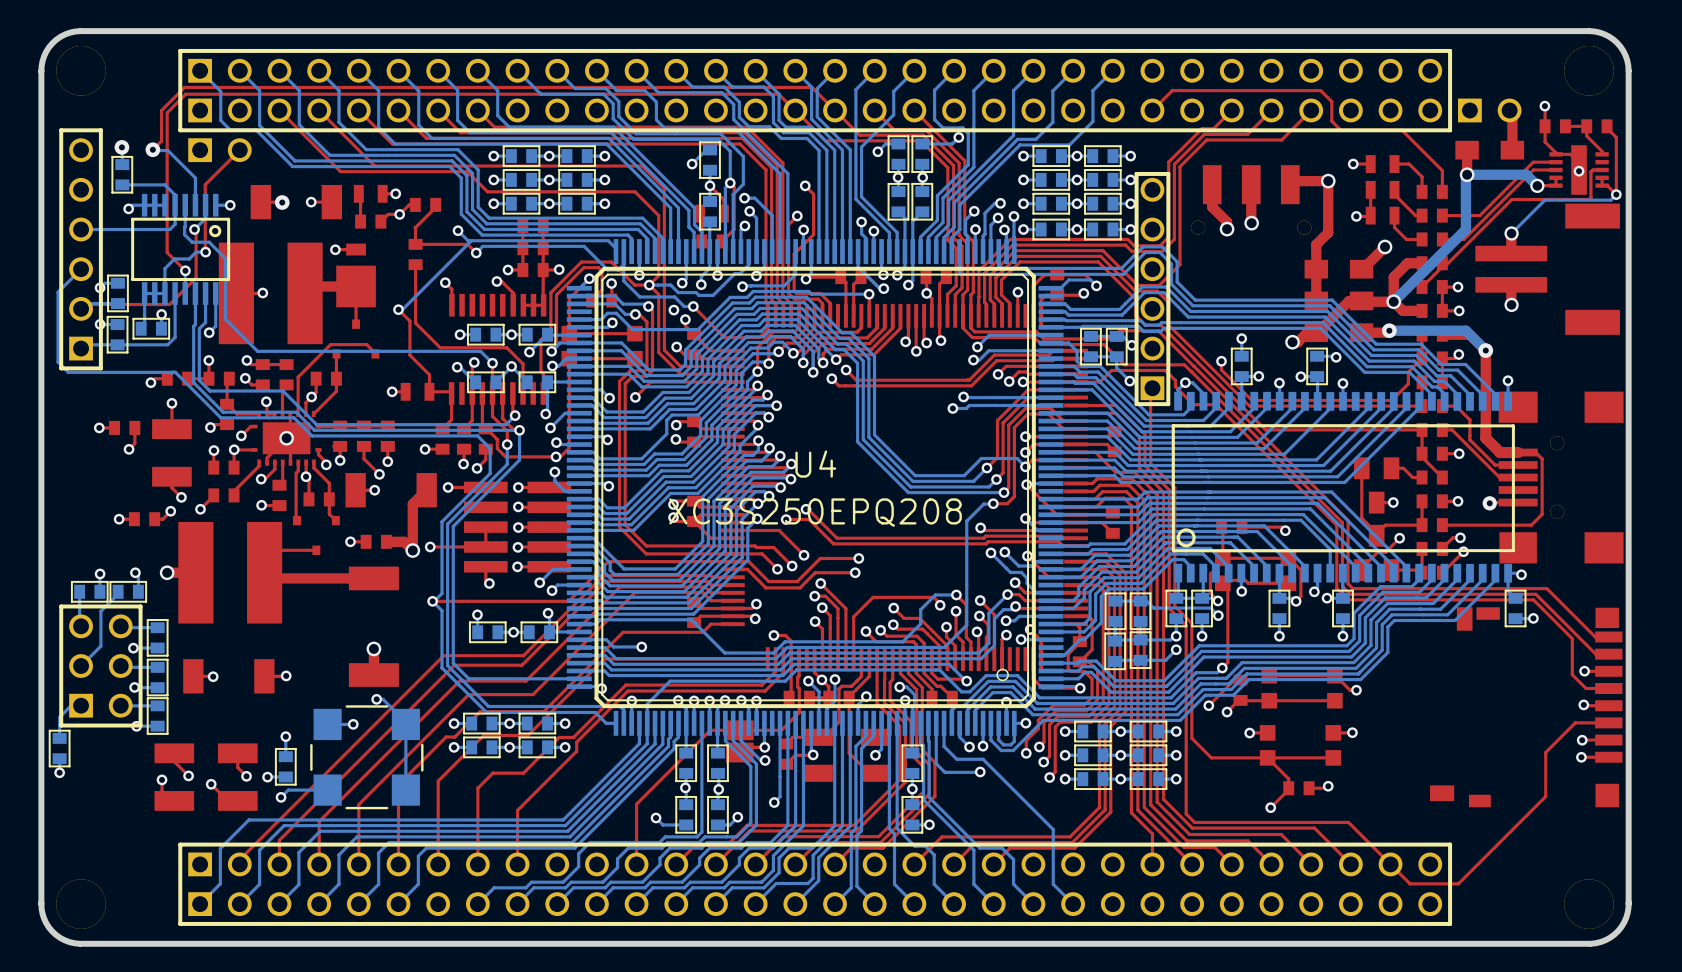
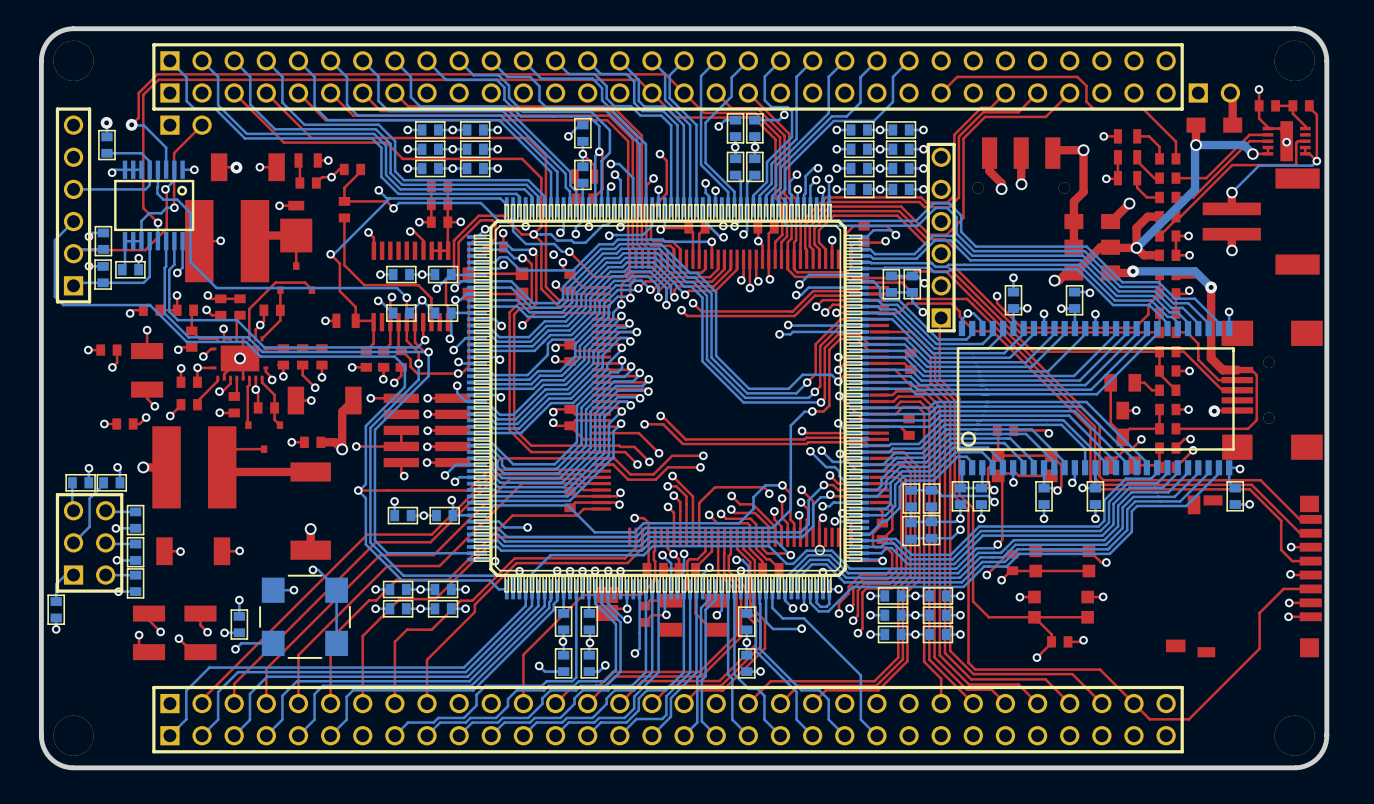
U4: XC3S250EPQ208 (815, 487) -> none
part: none -> (668, 398)

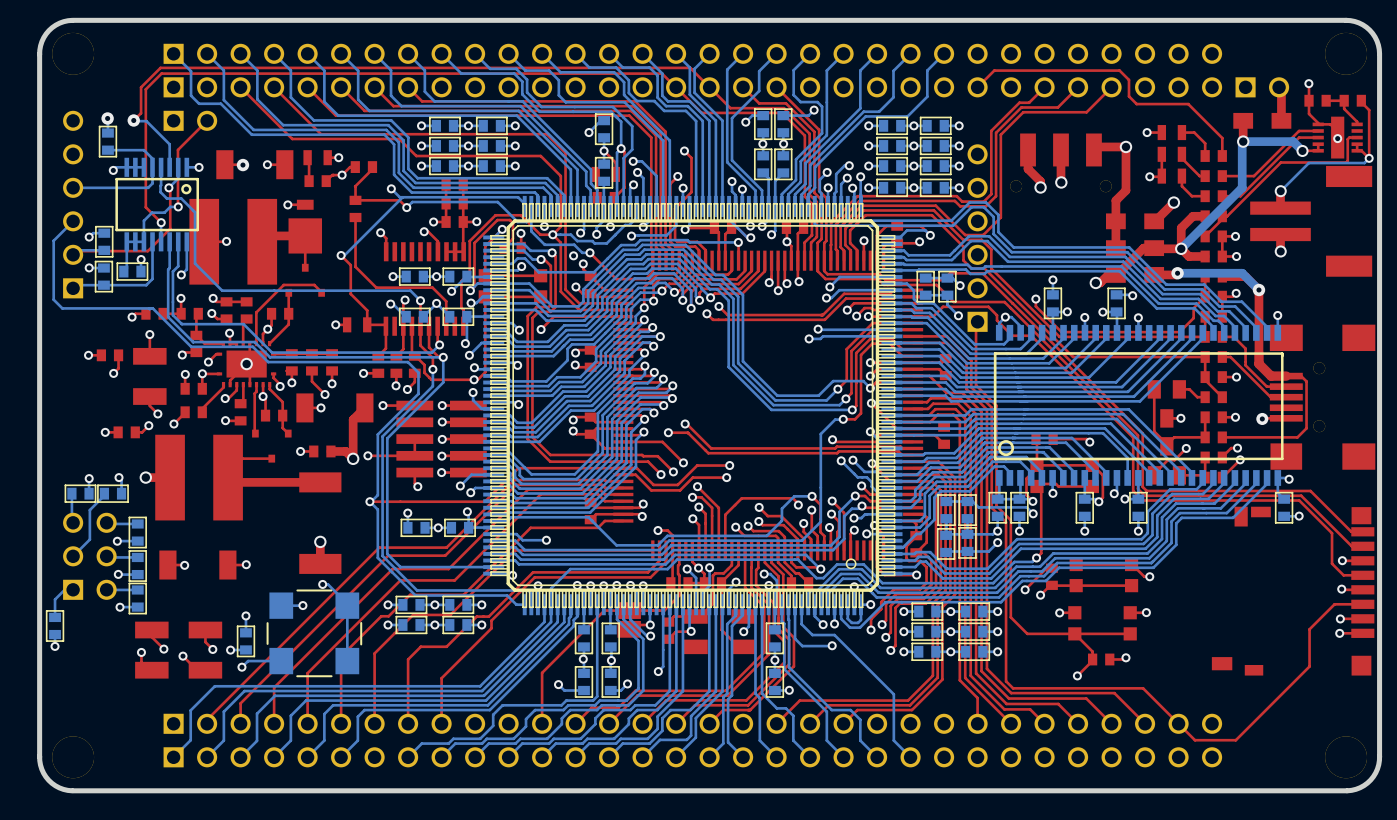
line: (1182, 44) (1182, 109) (153, 109) (153, 44) (1182, 44) -> none
line: (89, 109) (89, 301) (57, 301) (57, 109) (89, 109) -> none
line: (954, 144) (928, 144) (928, 330) (954, 330) (954, 144) -> none
line: (121, 494) (121, 591) (57, 591) (57, 494) (121, 494) -> none
line: (1182, 687) (1182, 751) (153, 751) (153, 687) (1182, 687) -> none

